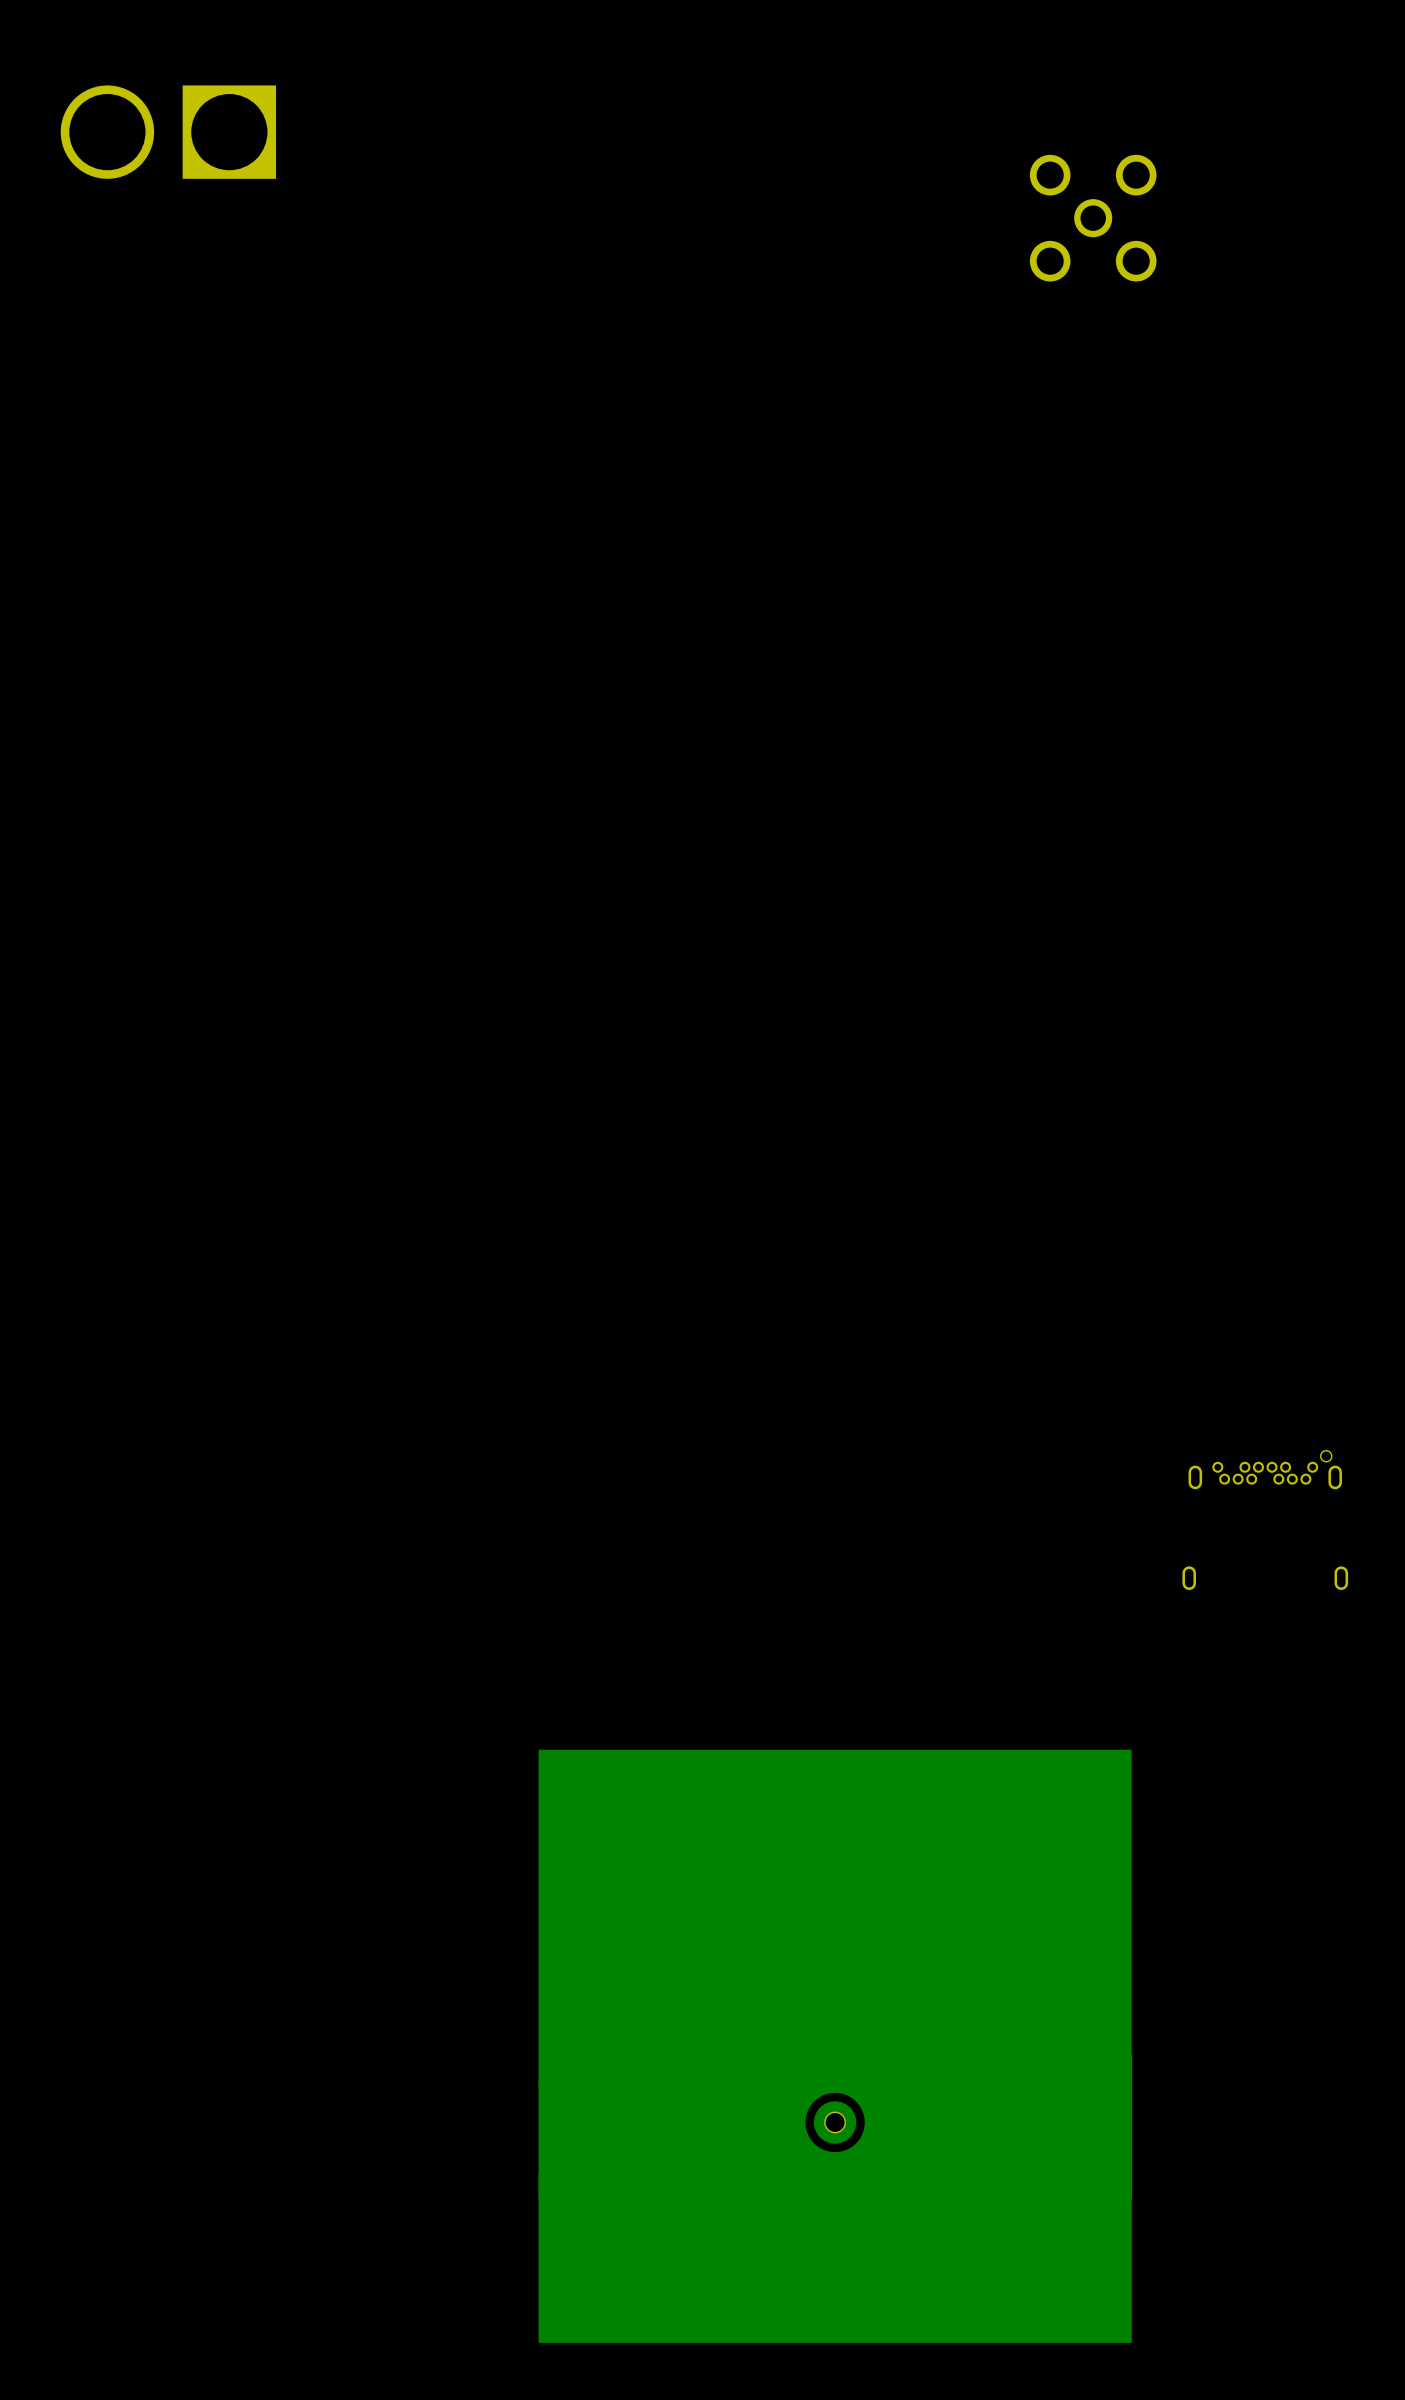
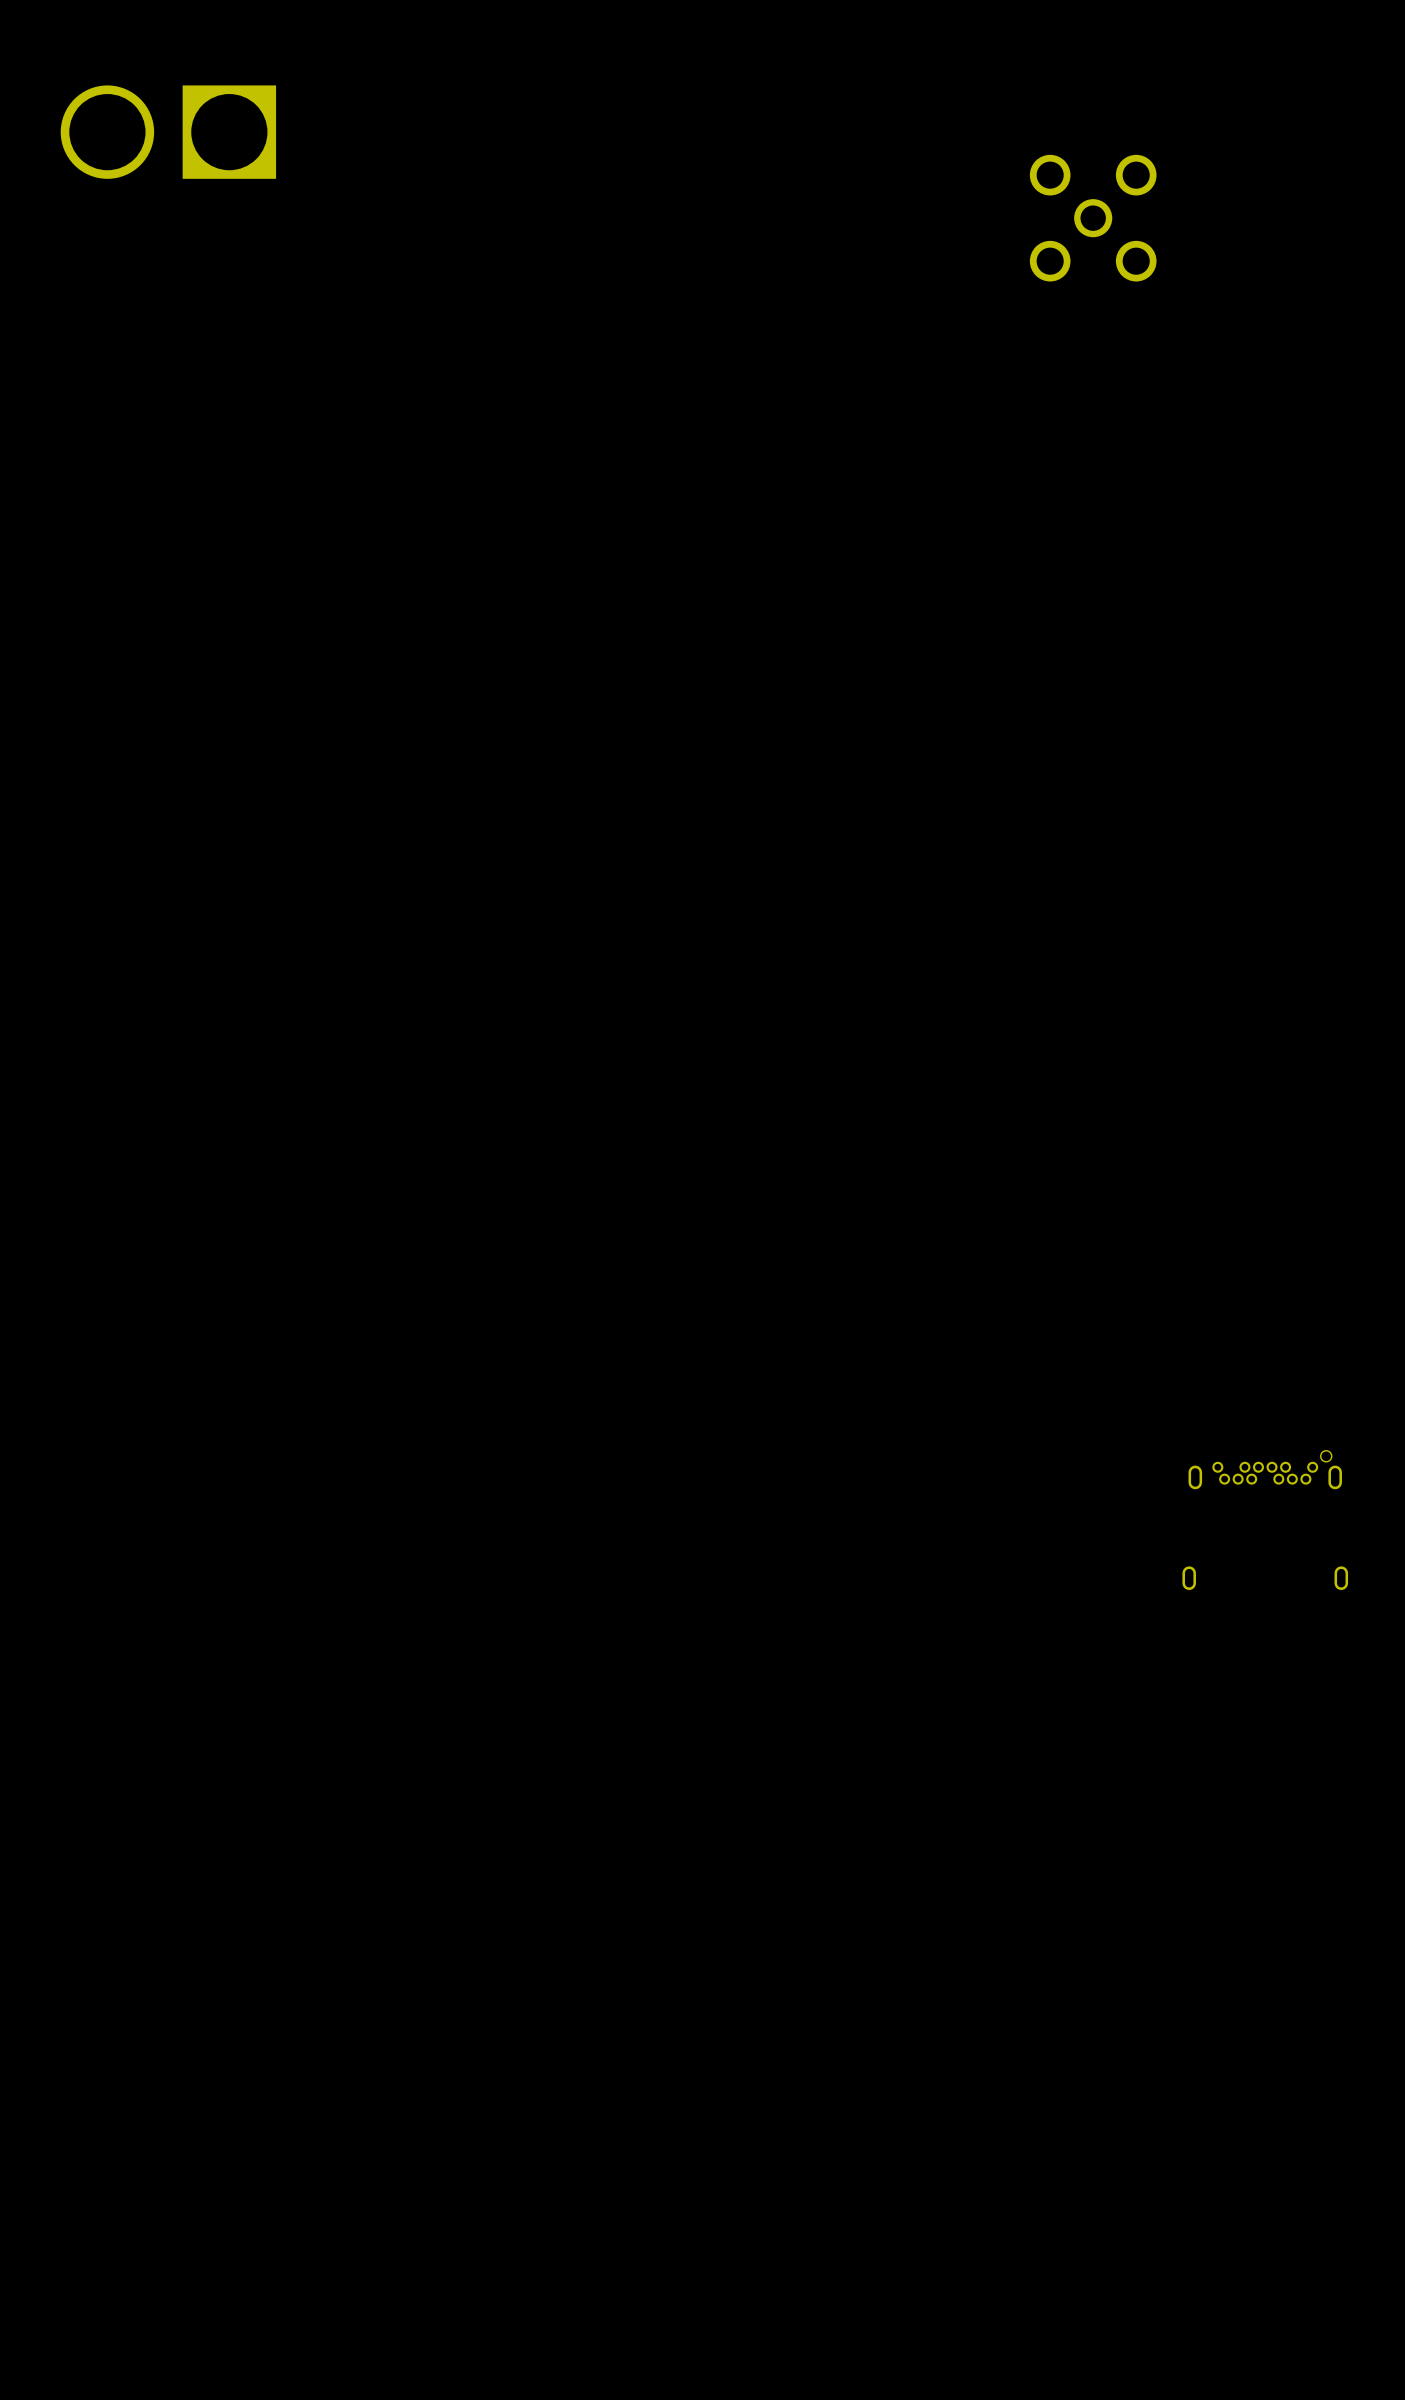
part: (835, 2046) -> none

